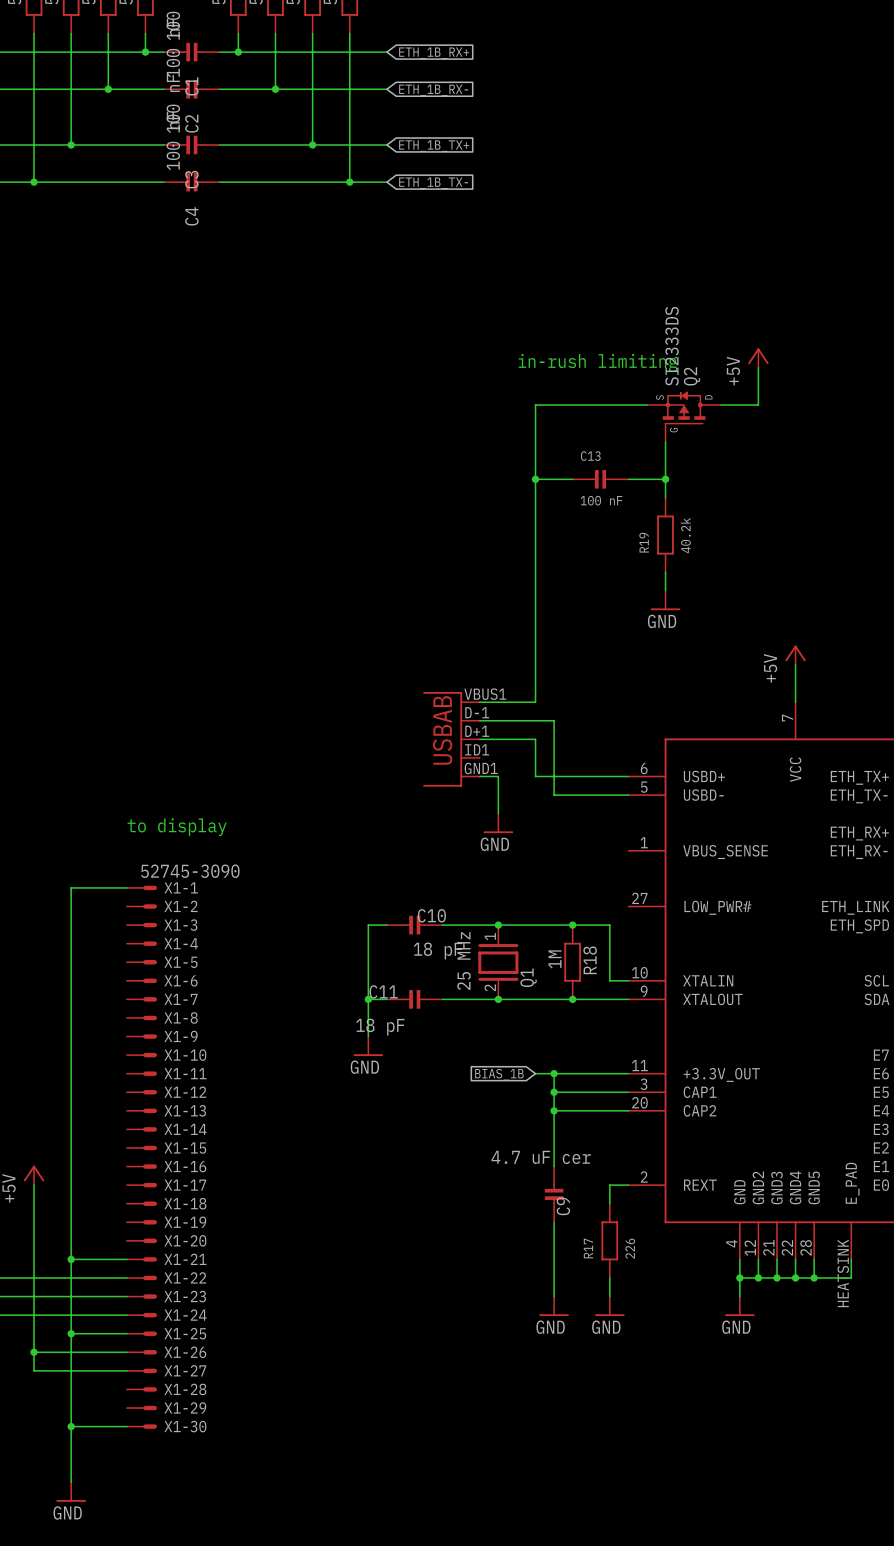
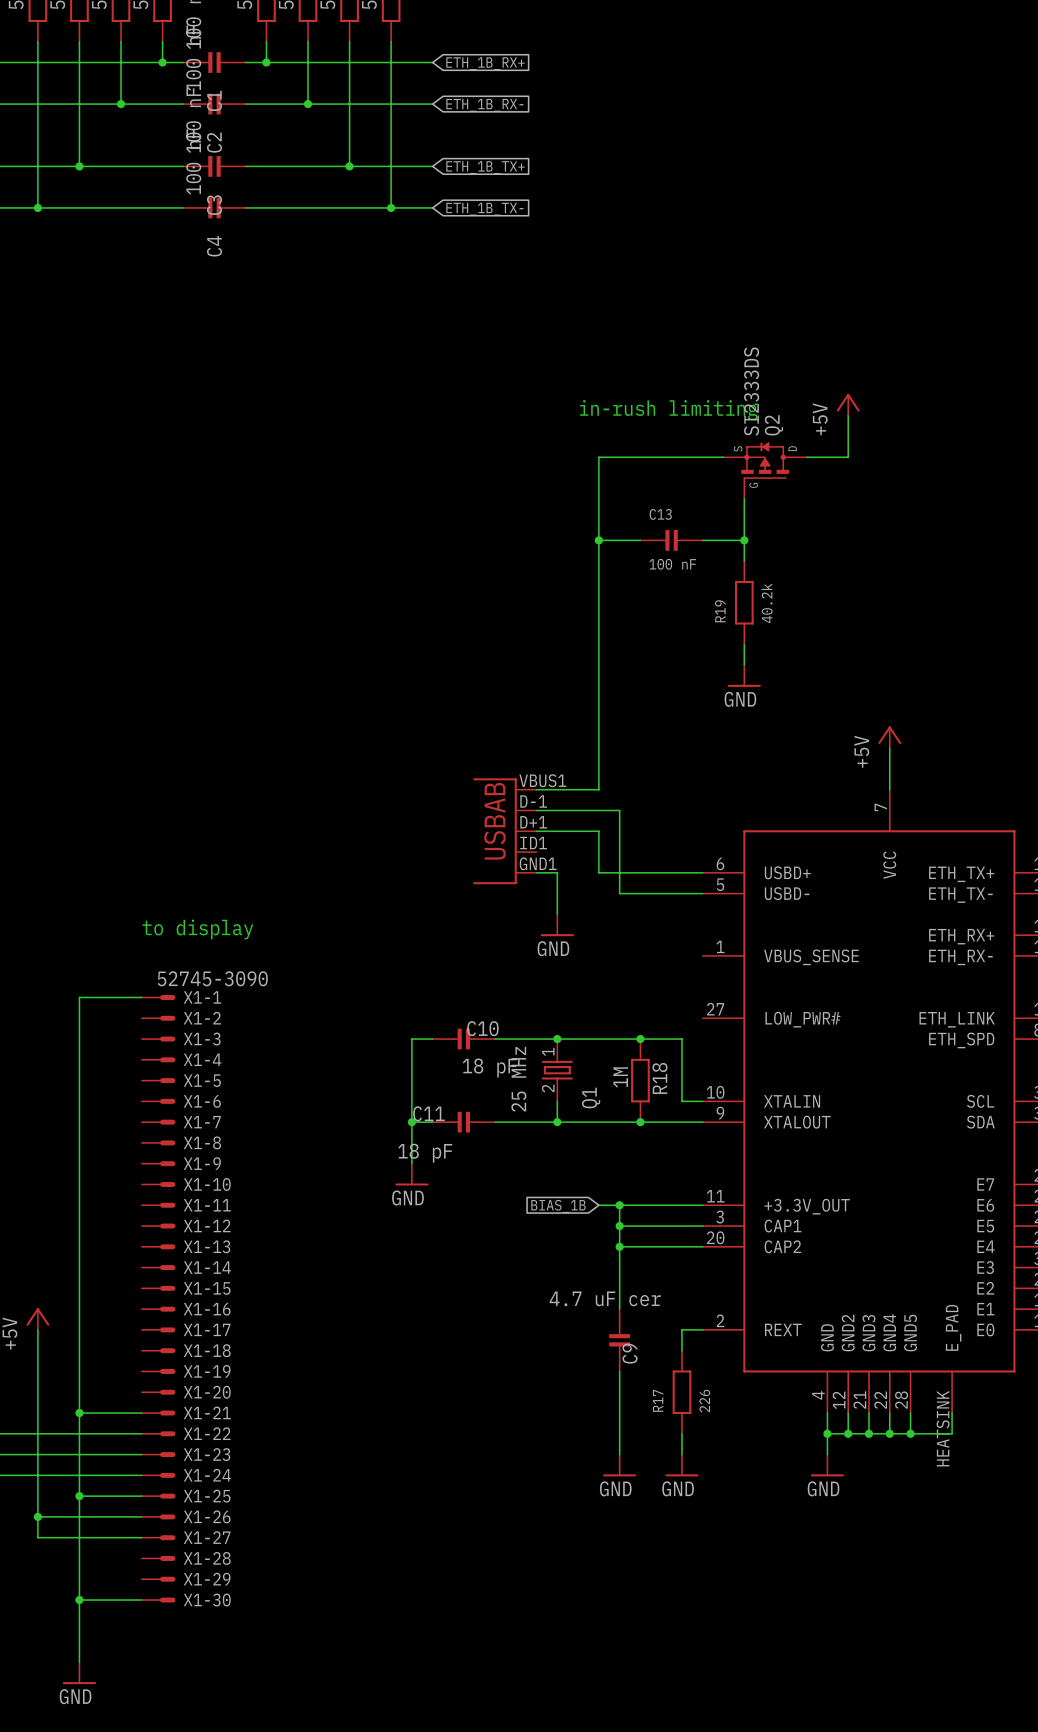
Q1 symbol: [478, 925, 519, 1000] -> [541, 1039, 573, 1102]

